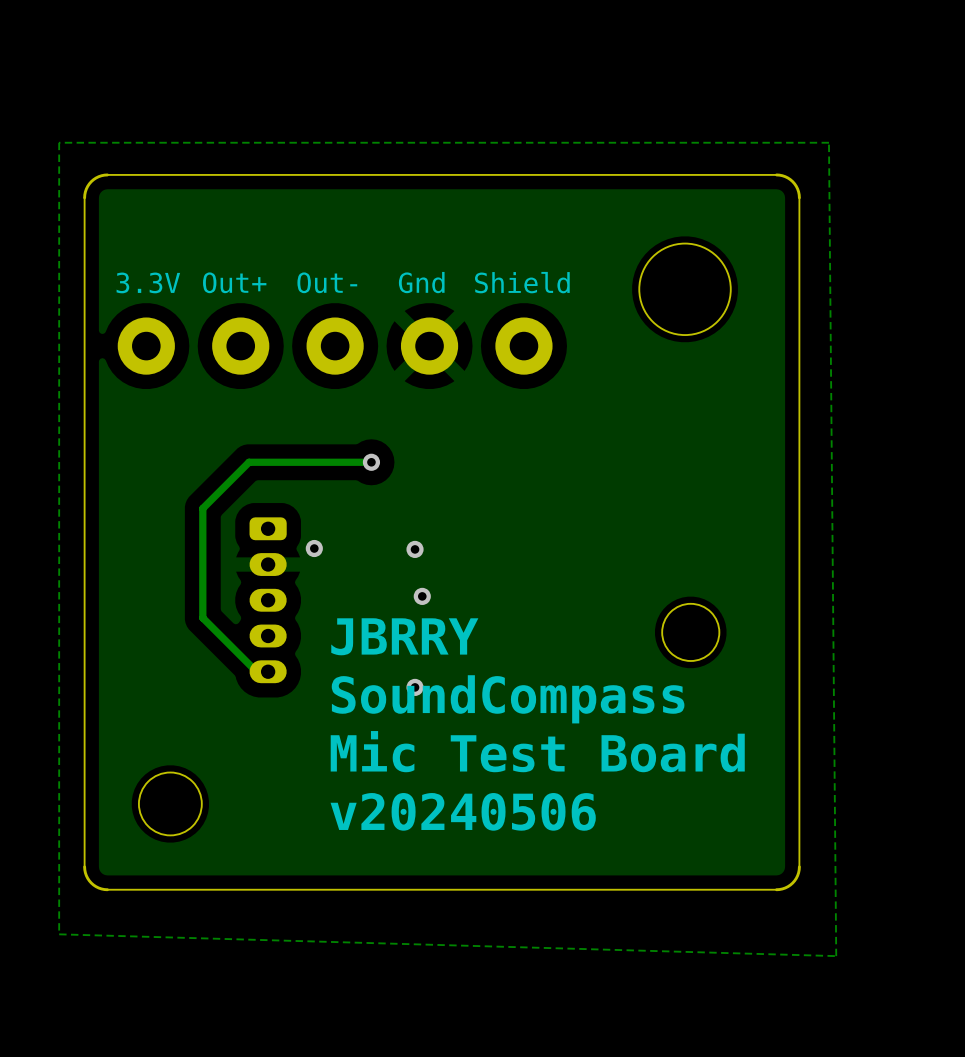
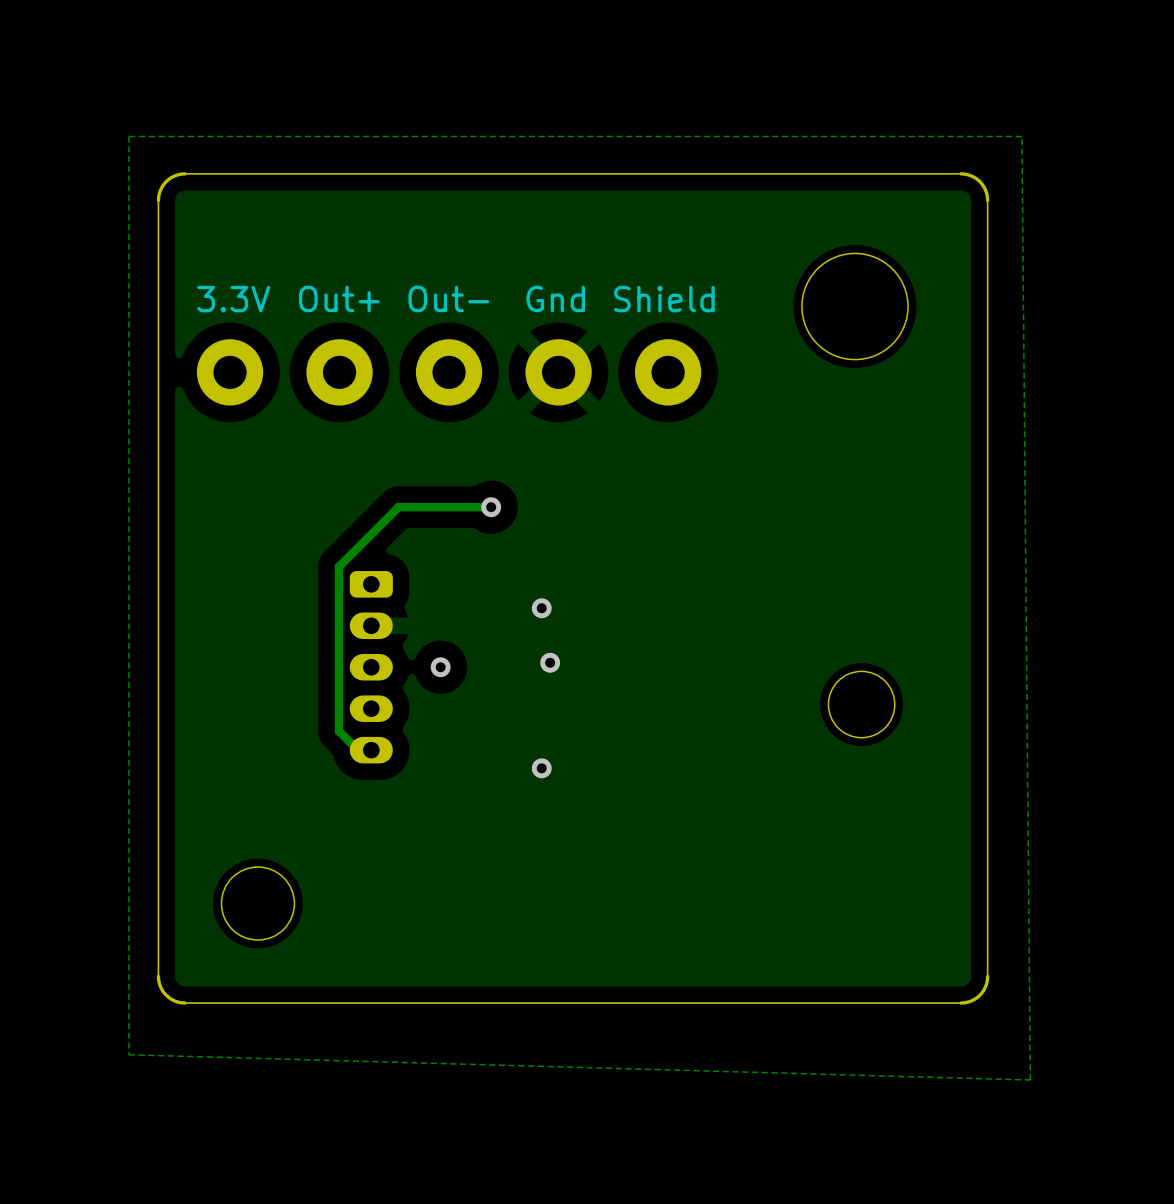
track: (291, 462) (249, 462) (202, 508) (202, 617) (240, 655) -> (398, 507) (338, 566) (338, 731)
via position: (314, 548) -> (440, 667)
text: JBRRY (404, 636) -> none
text: SoundCompass (508, 699) -> none
text: Mic Test Board (537, 751) -> none
text: v20240506 (463, 811) -> none

